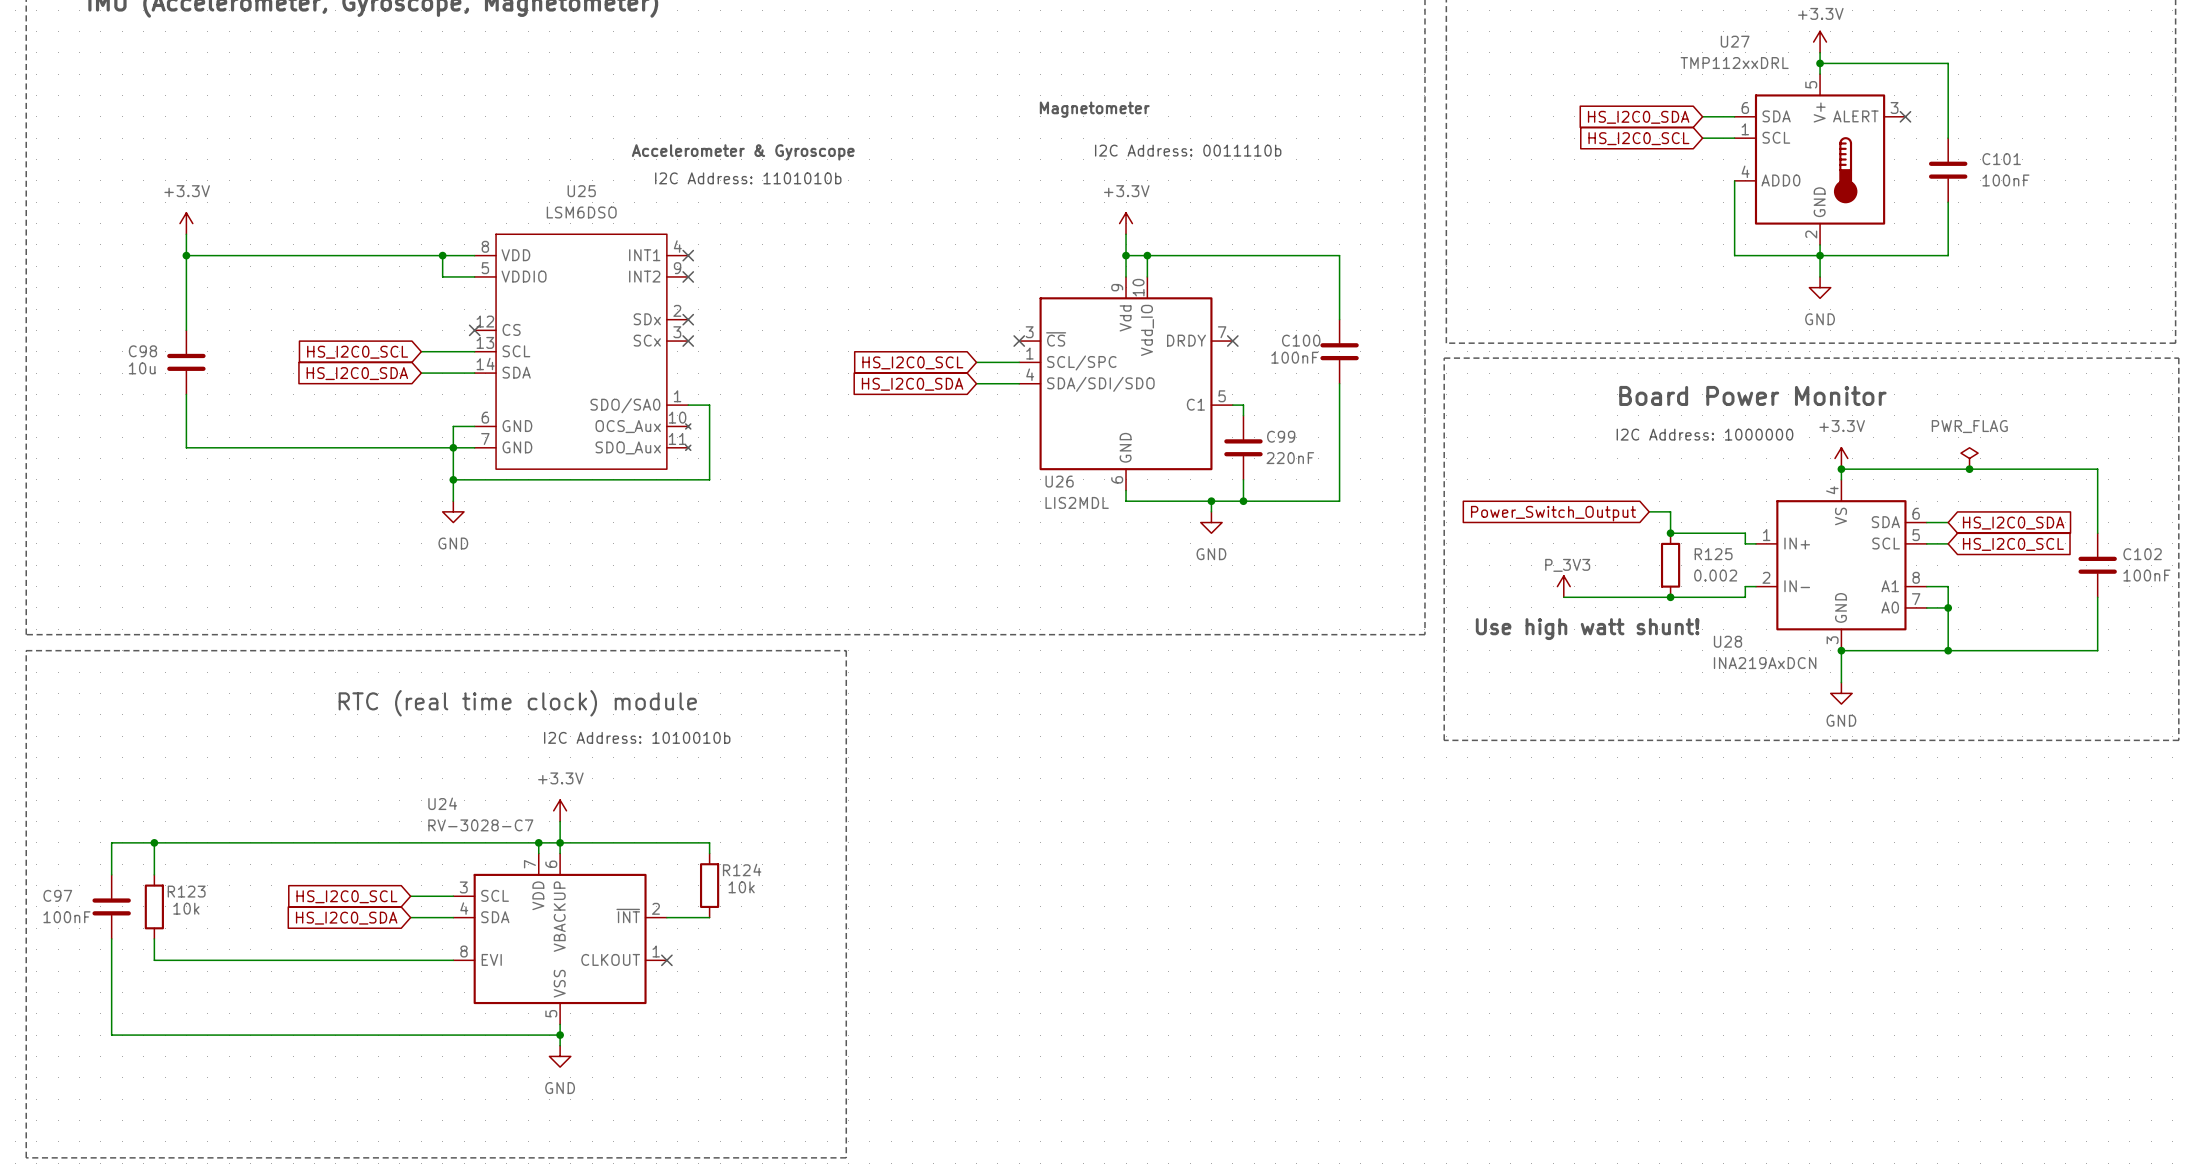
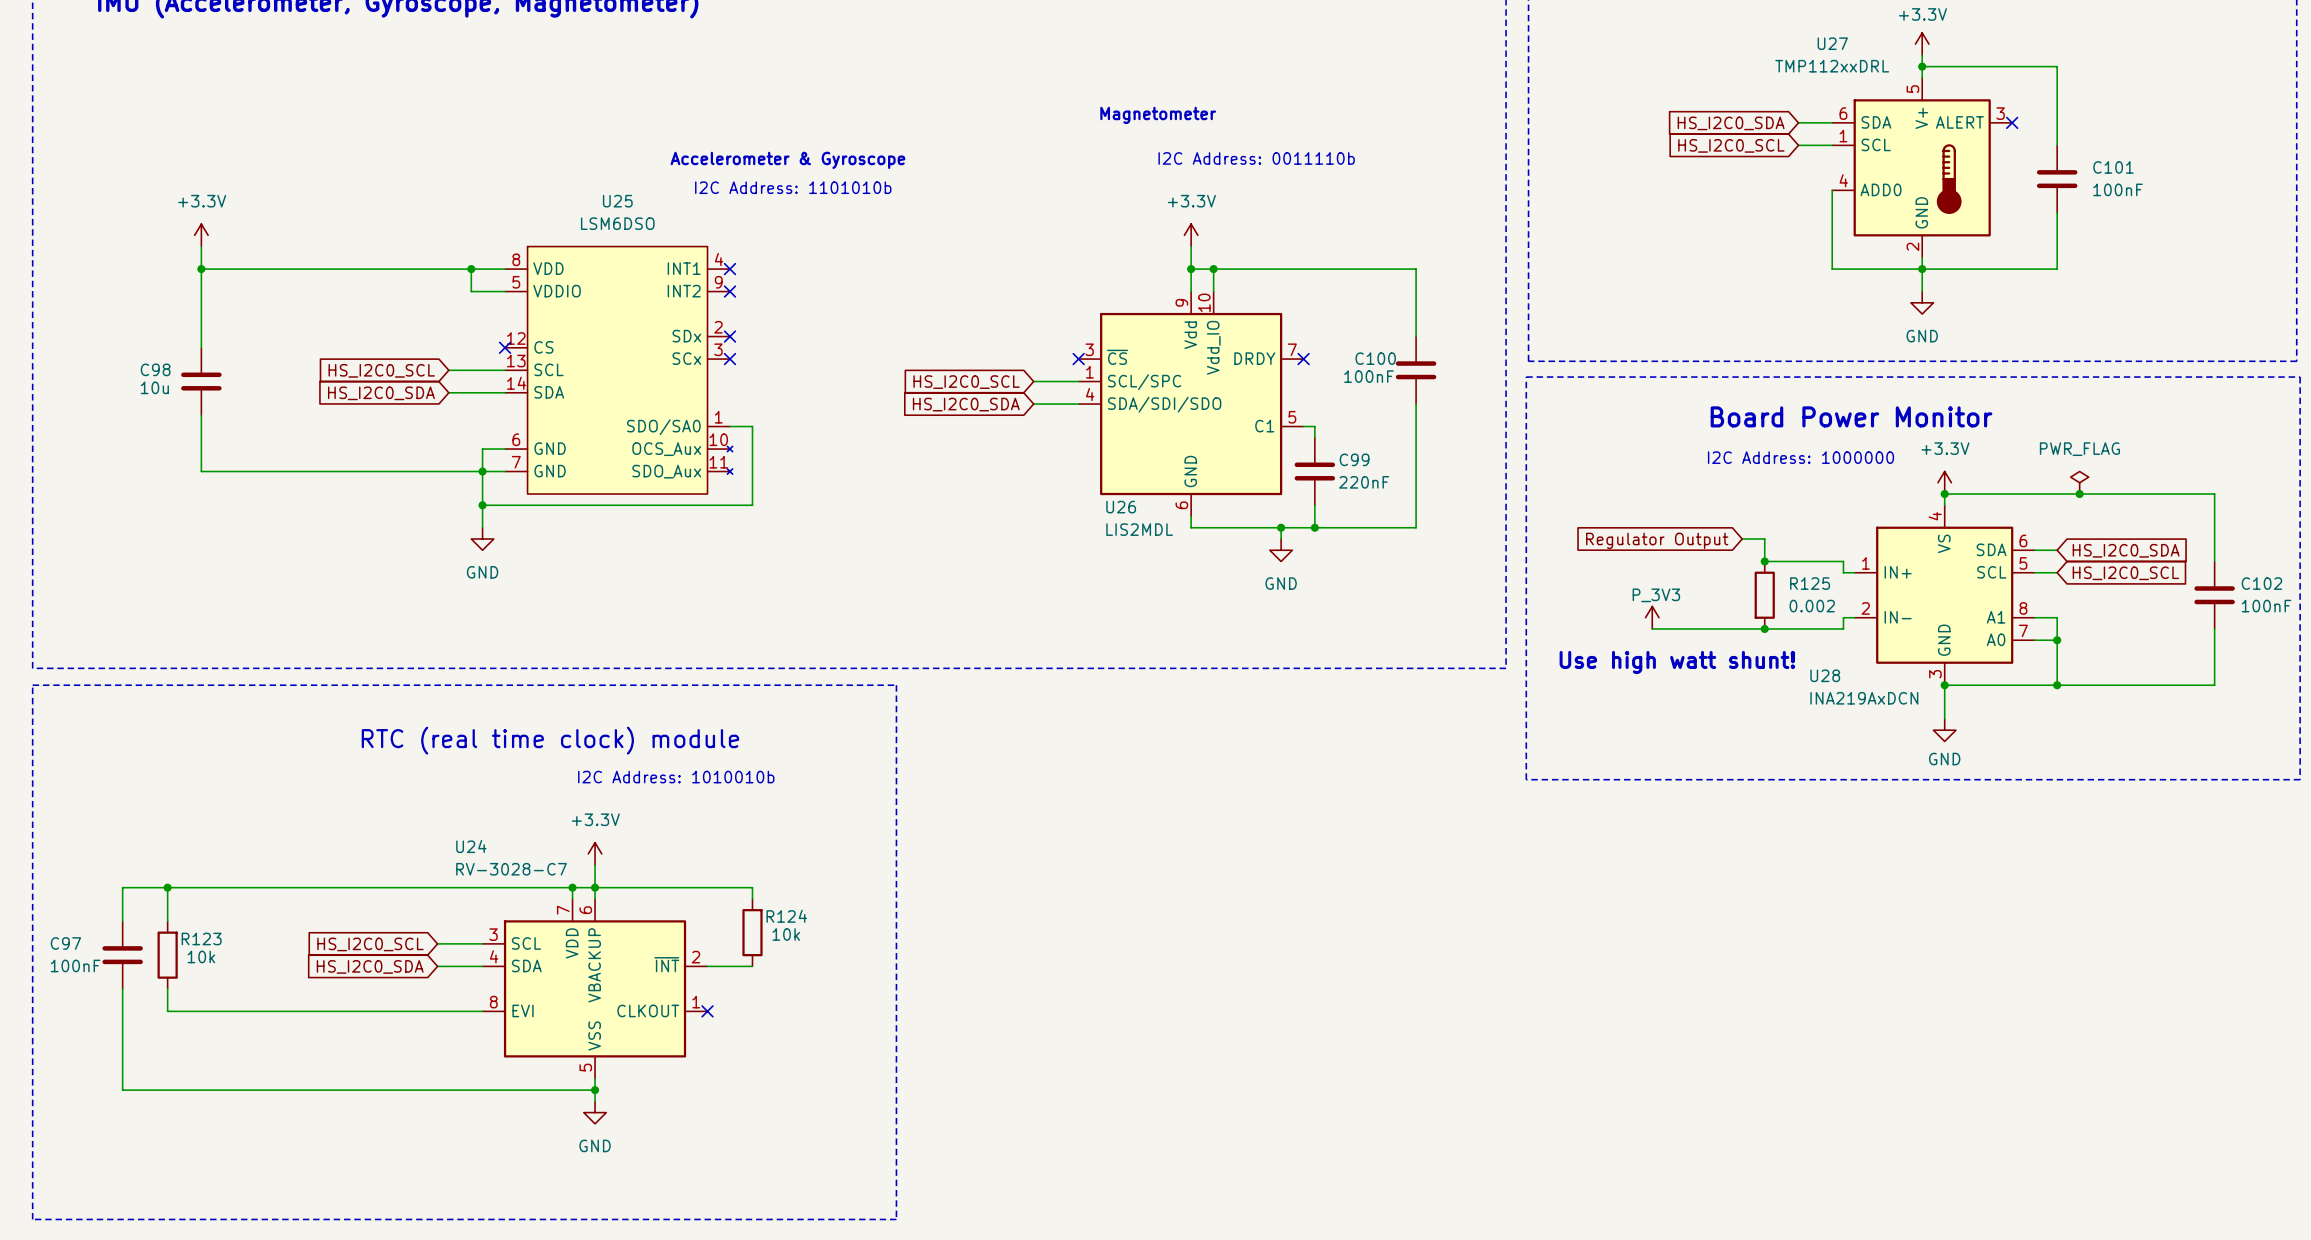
global label: Power_Switch_Output (1553, 513) -> Regulator Output (1657, 540)

